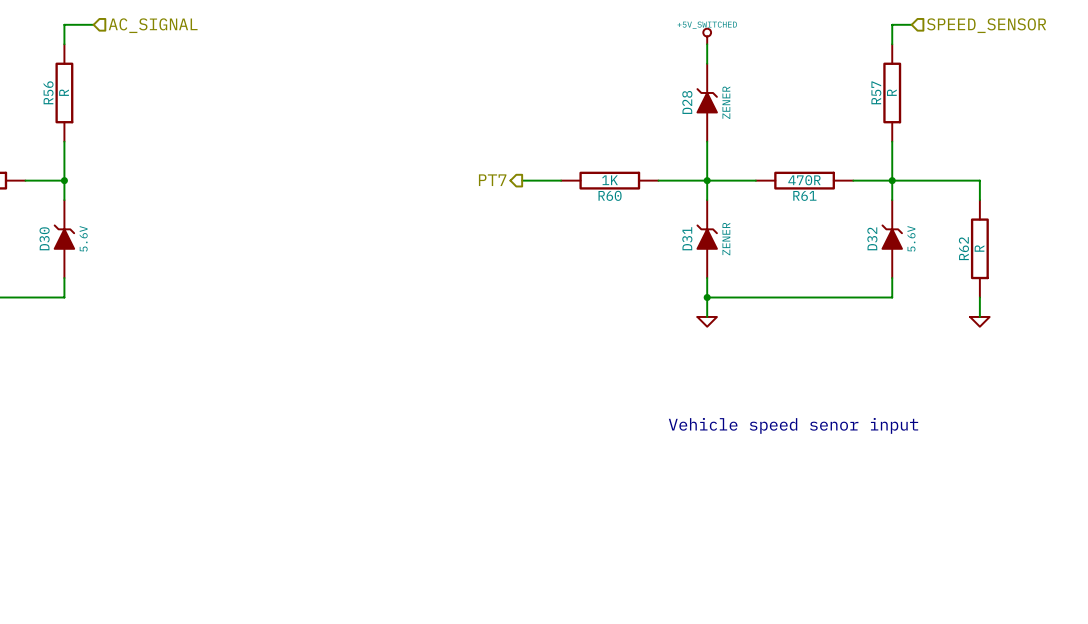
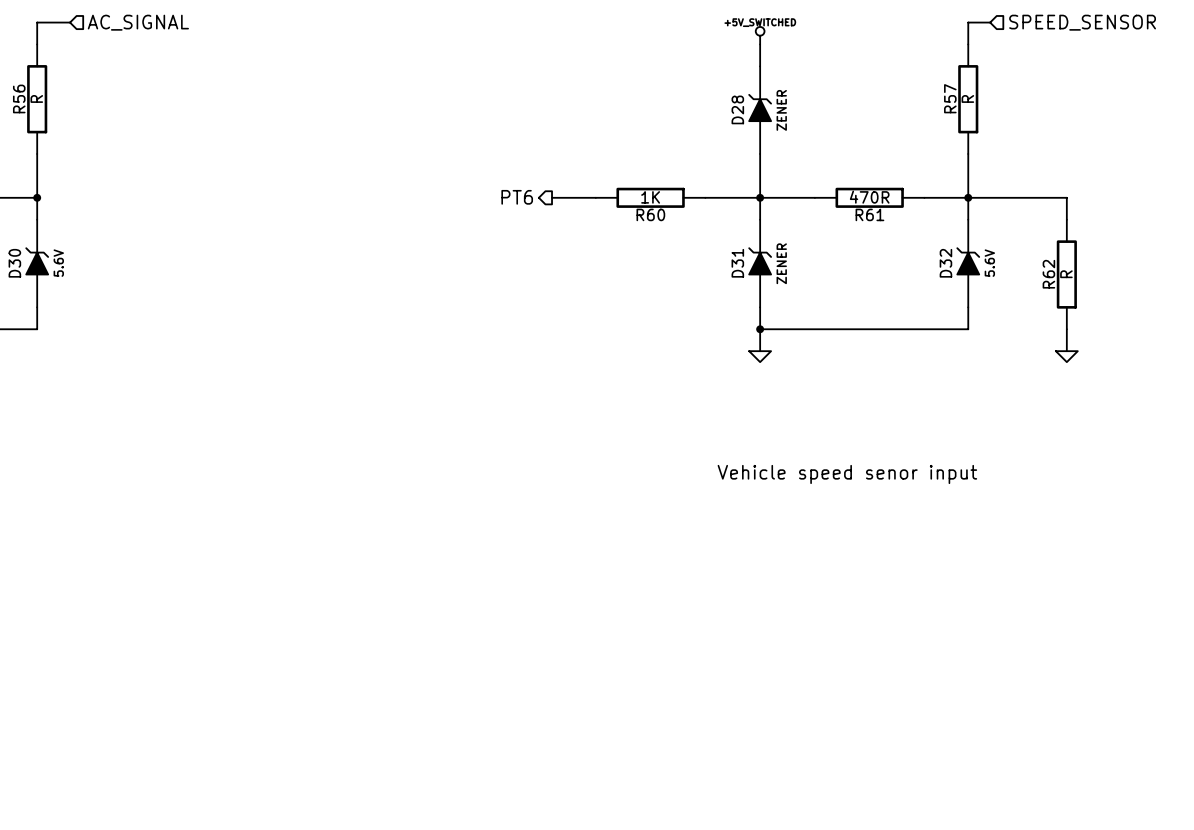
hierarchical label: PT7 (492, 180) -> PT6 (517, 197)

